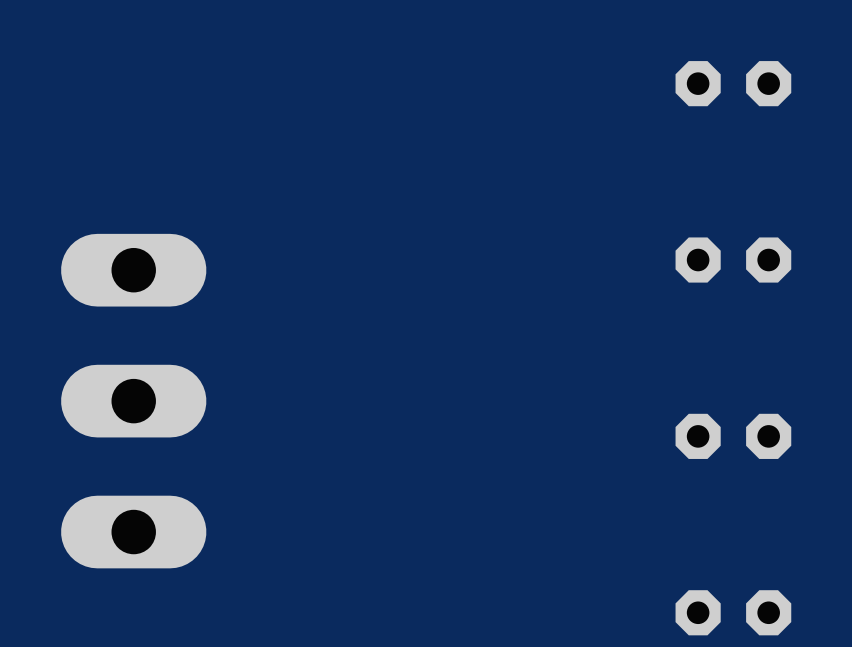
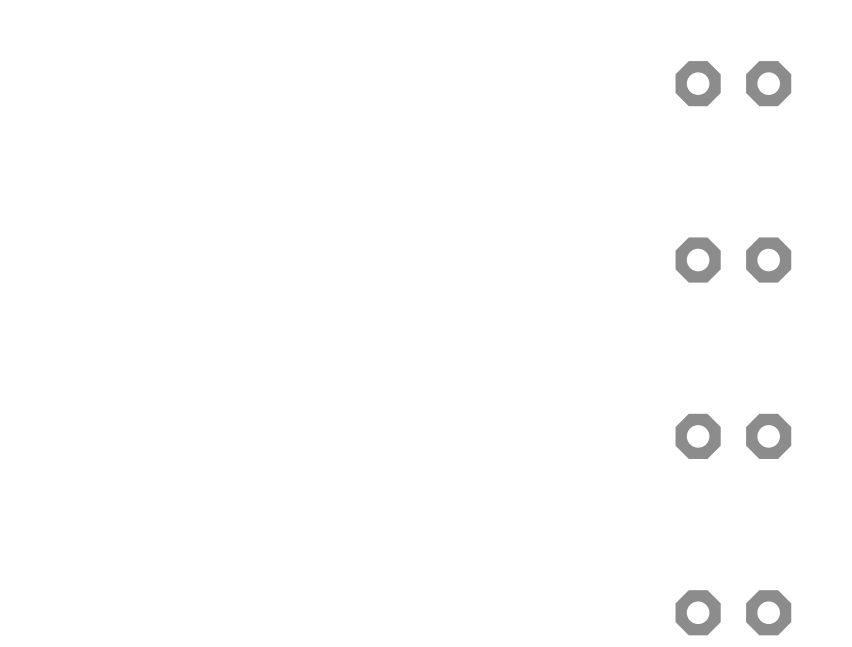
part: (133, 401) -> none

